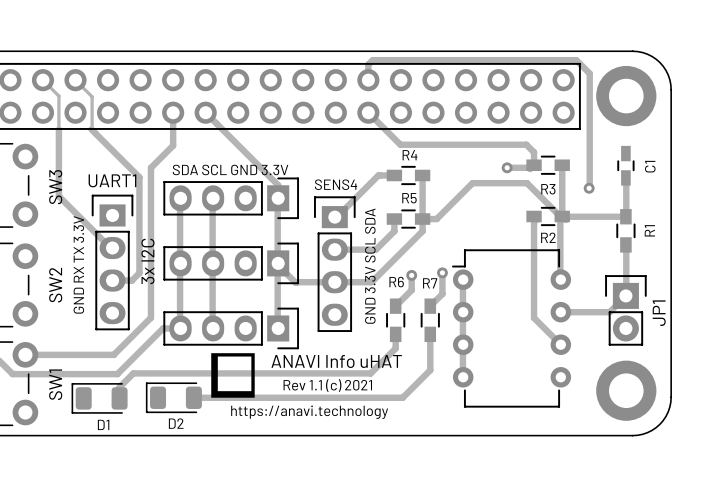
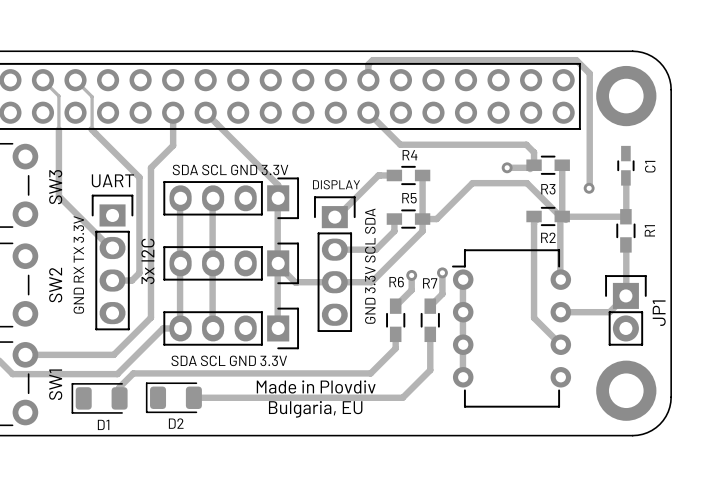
UART1 name: UART1 (112, 180) -> UART (112, 180)
SENS4 name: SENS4 (336, 184) -> DISPLAY (336, 184)
drawing: [211, 353, 255, 398] -> none
text: none -> SDA SCL GND 3.3V (229, 360)
text: ANAVI Info uHAT (336, 361) -> none
text: Rev 1.1 (c) 2021 (327, 385) -> none
text: none -> Made in Plovdiv (316, 386)
text: https://anavi.technology (309, 412) -> Bulgaria, EU (315, 409)

